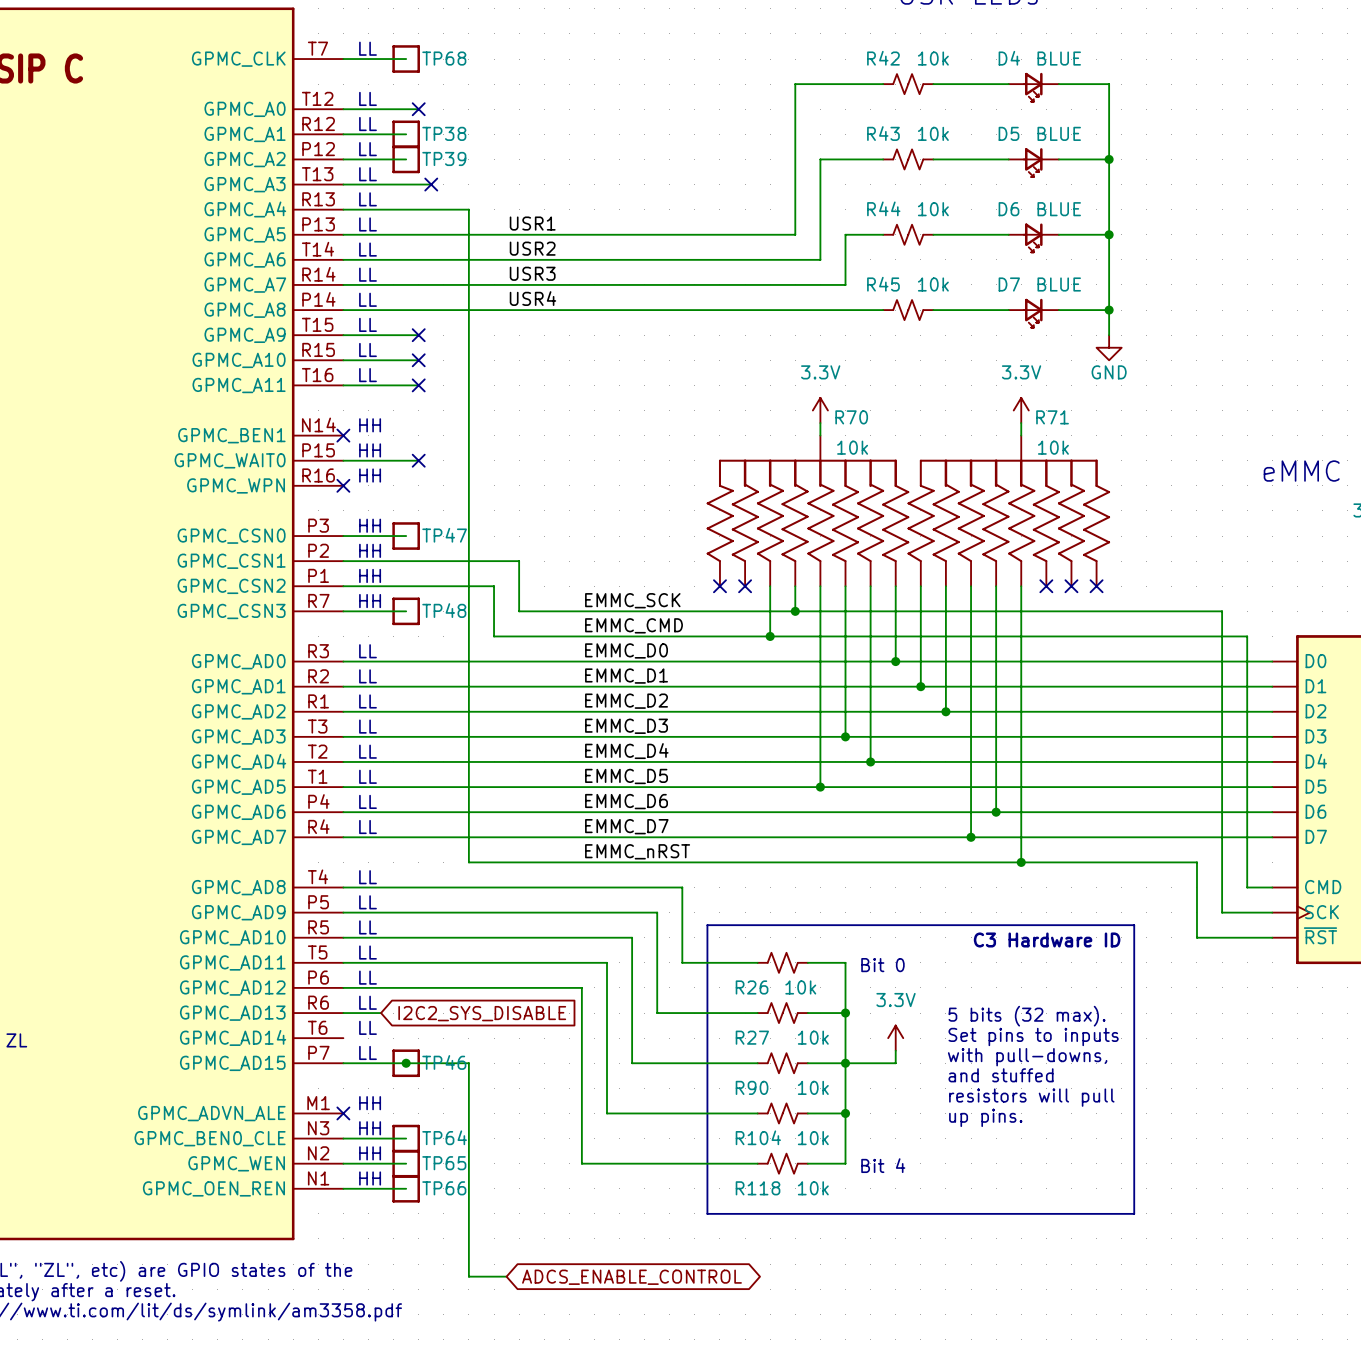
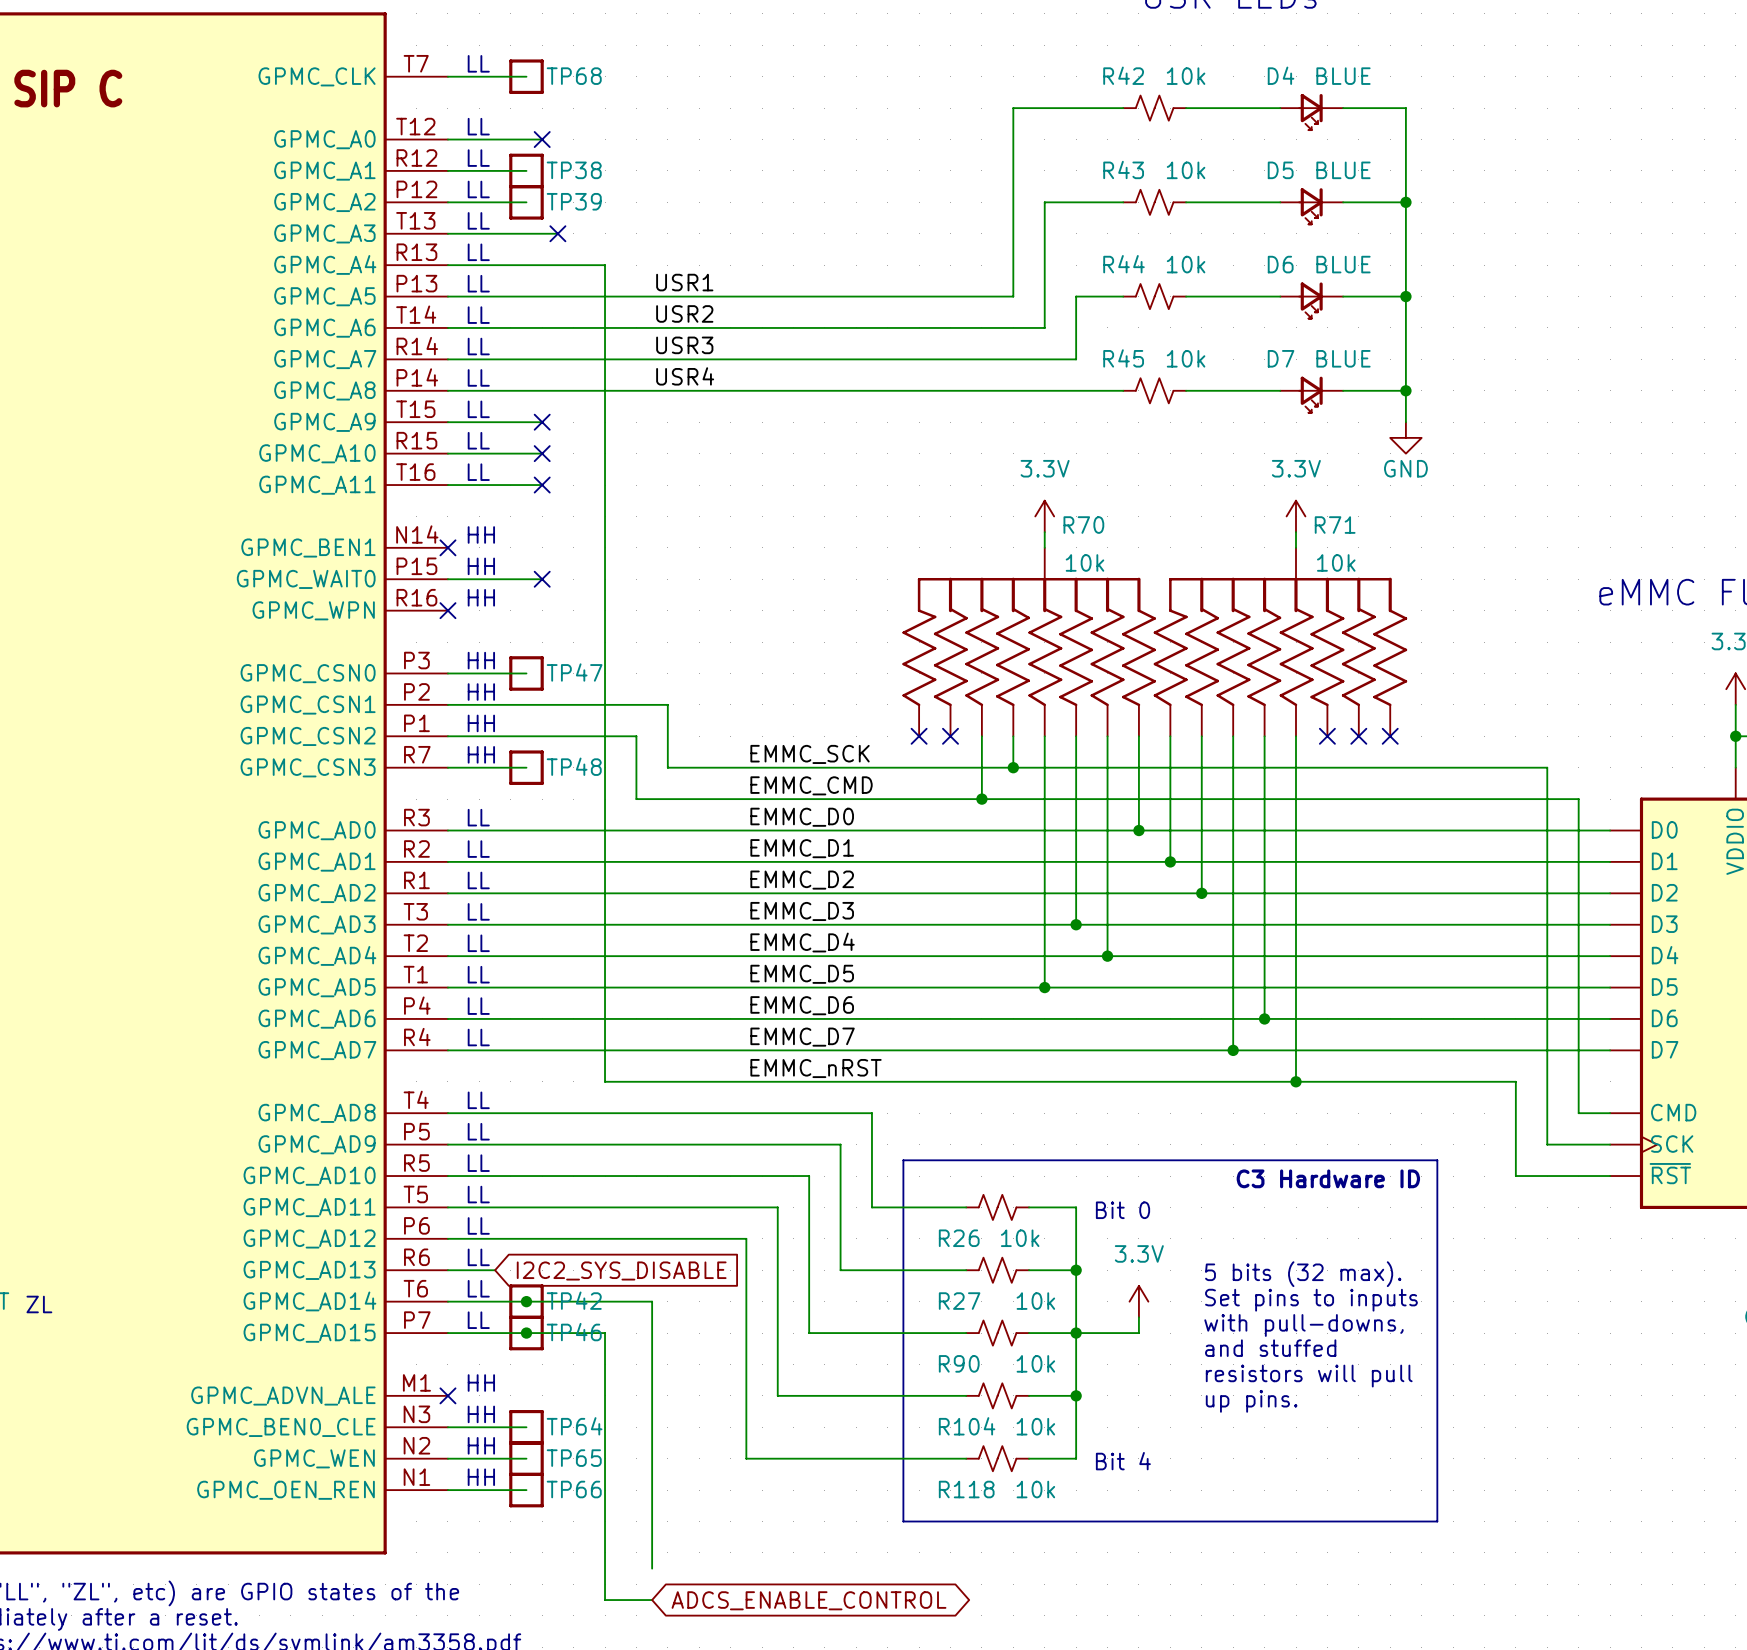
wire: none -> (447, 1301) (652, 1301) (652, 1568)
junction: none -> (526, 1301)
TP42: none -> (526, 1301)

